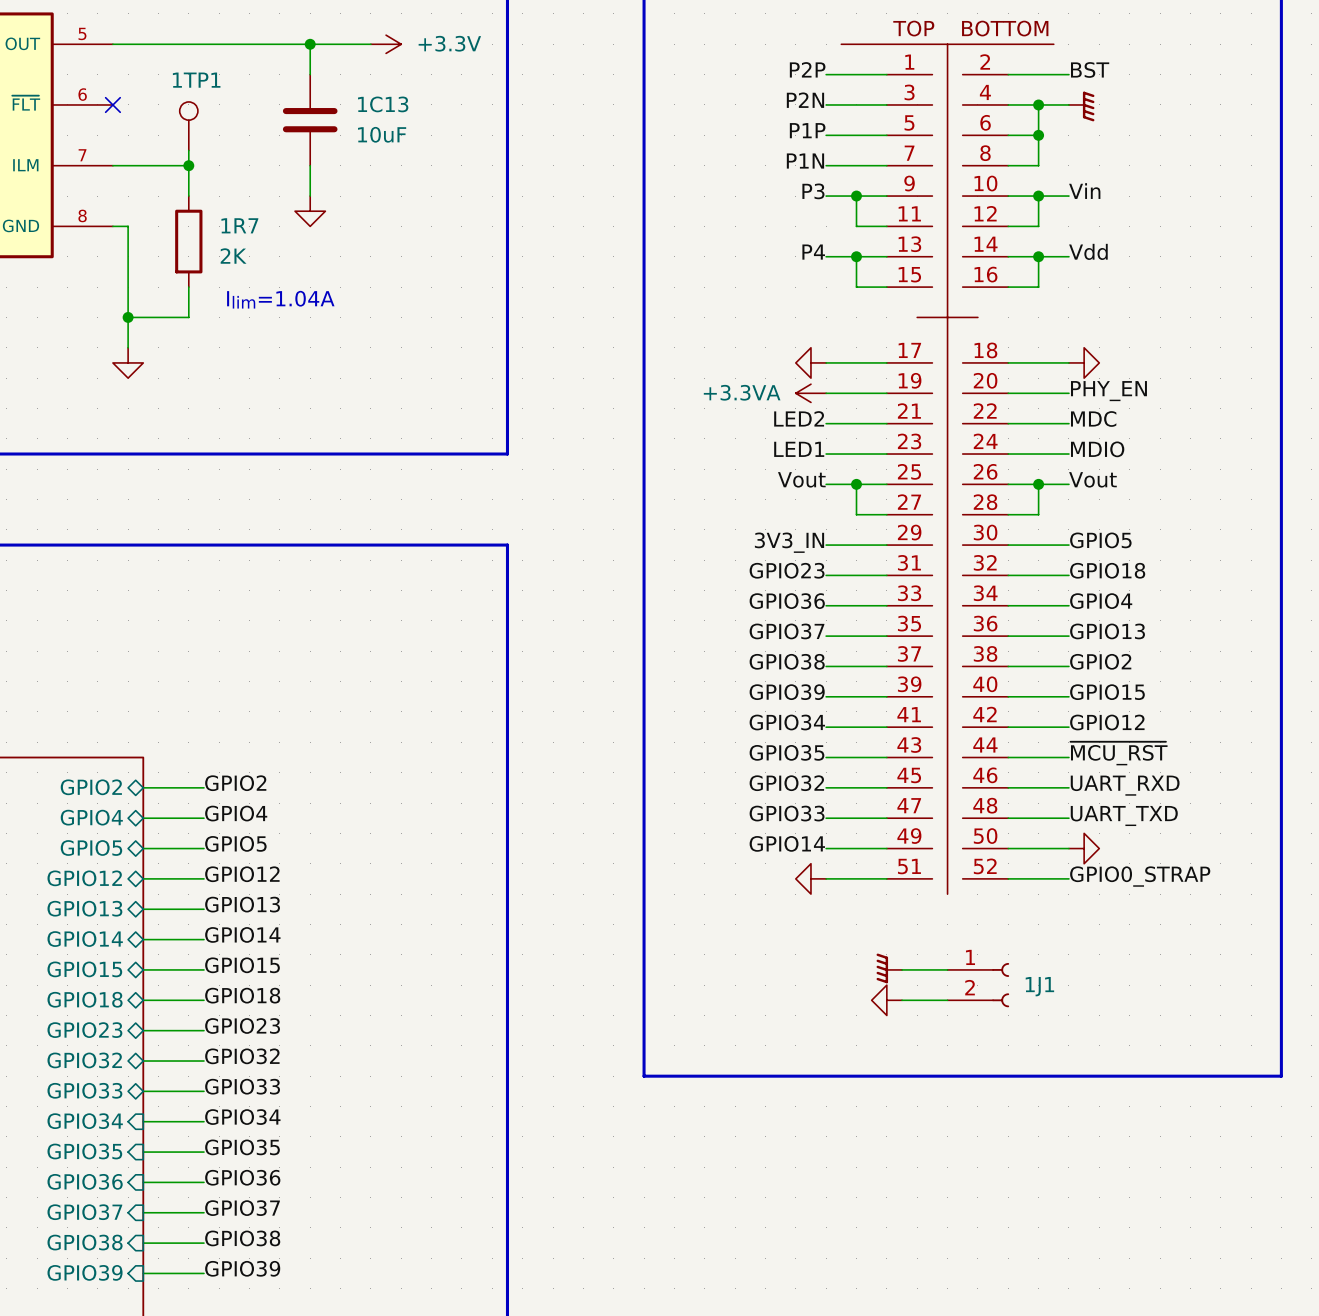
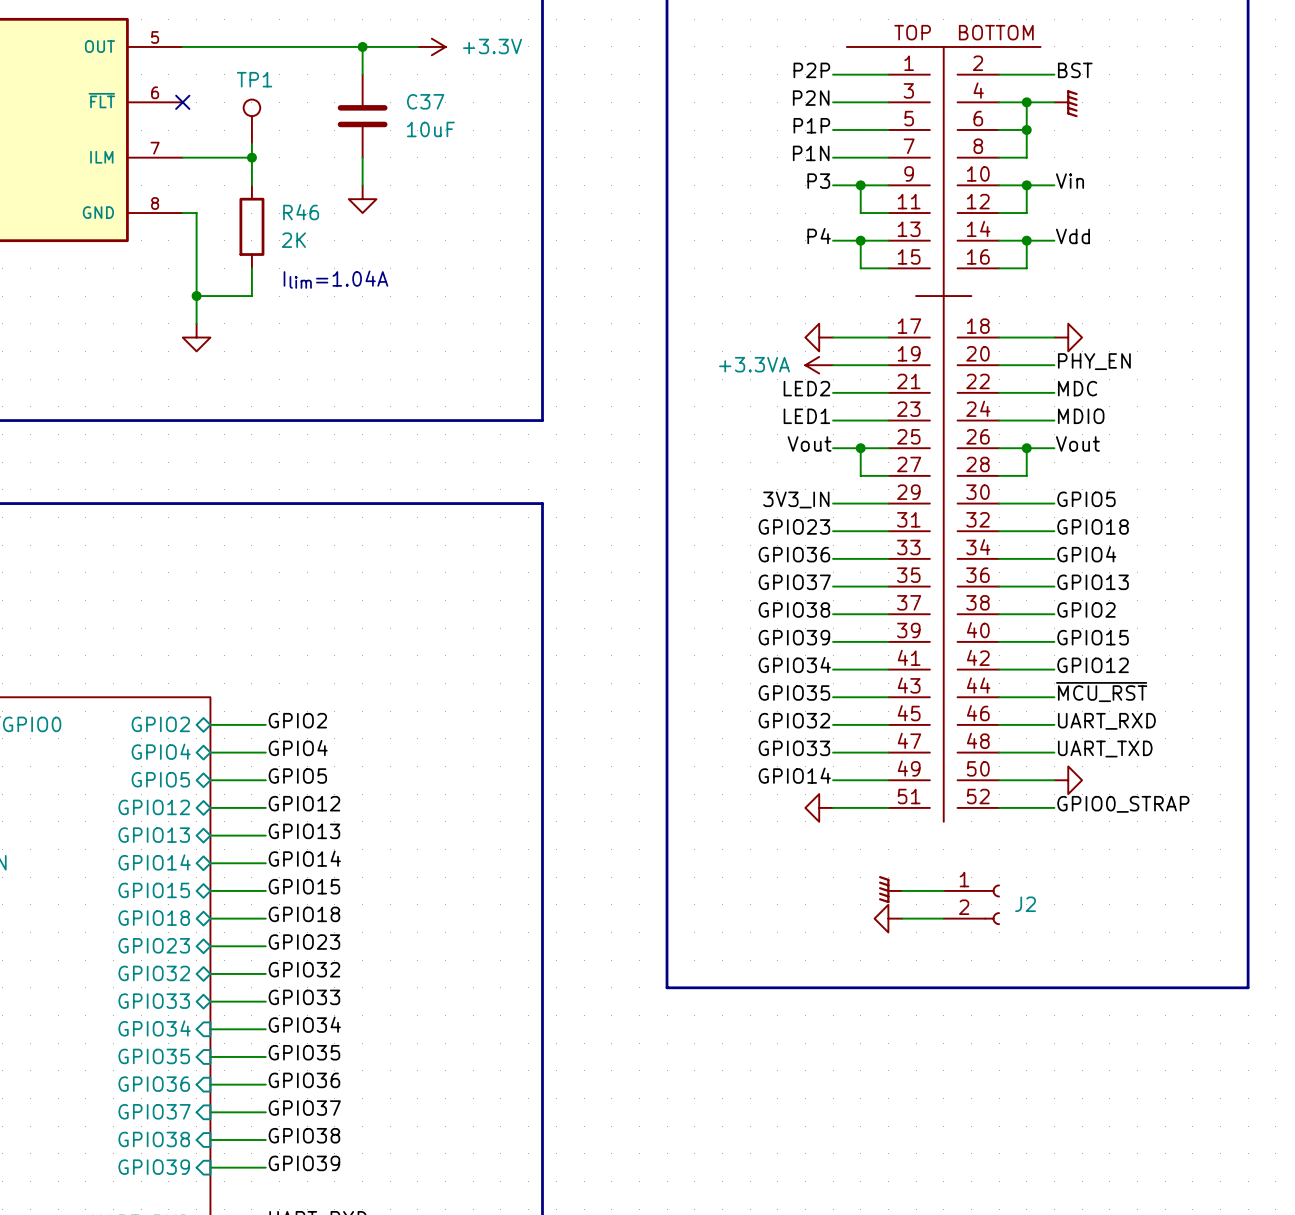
1TP1 name: 1TP1 (196, 80) -> TP1 (254, 79)
1C13 name: 1C13 (383, 104) -> C37 (425, 101)
1R7 name: 1R7 (239, 225) -> R46 (301, 212)
1J1 name: 1J1 (1039, 986) -> J2 (1025, 904)

